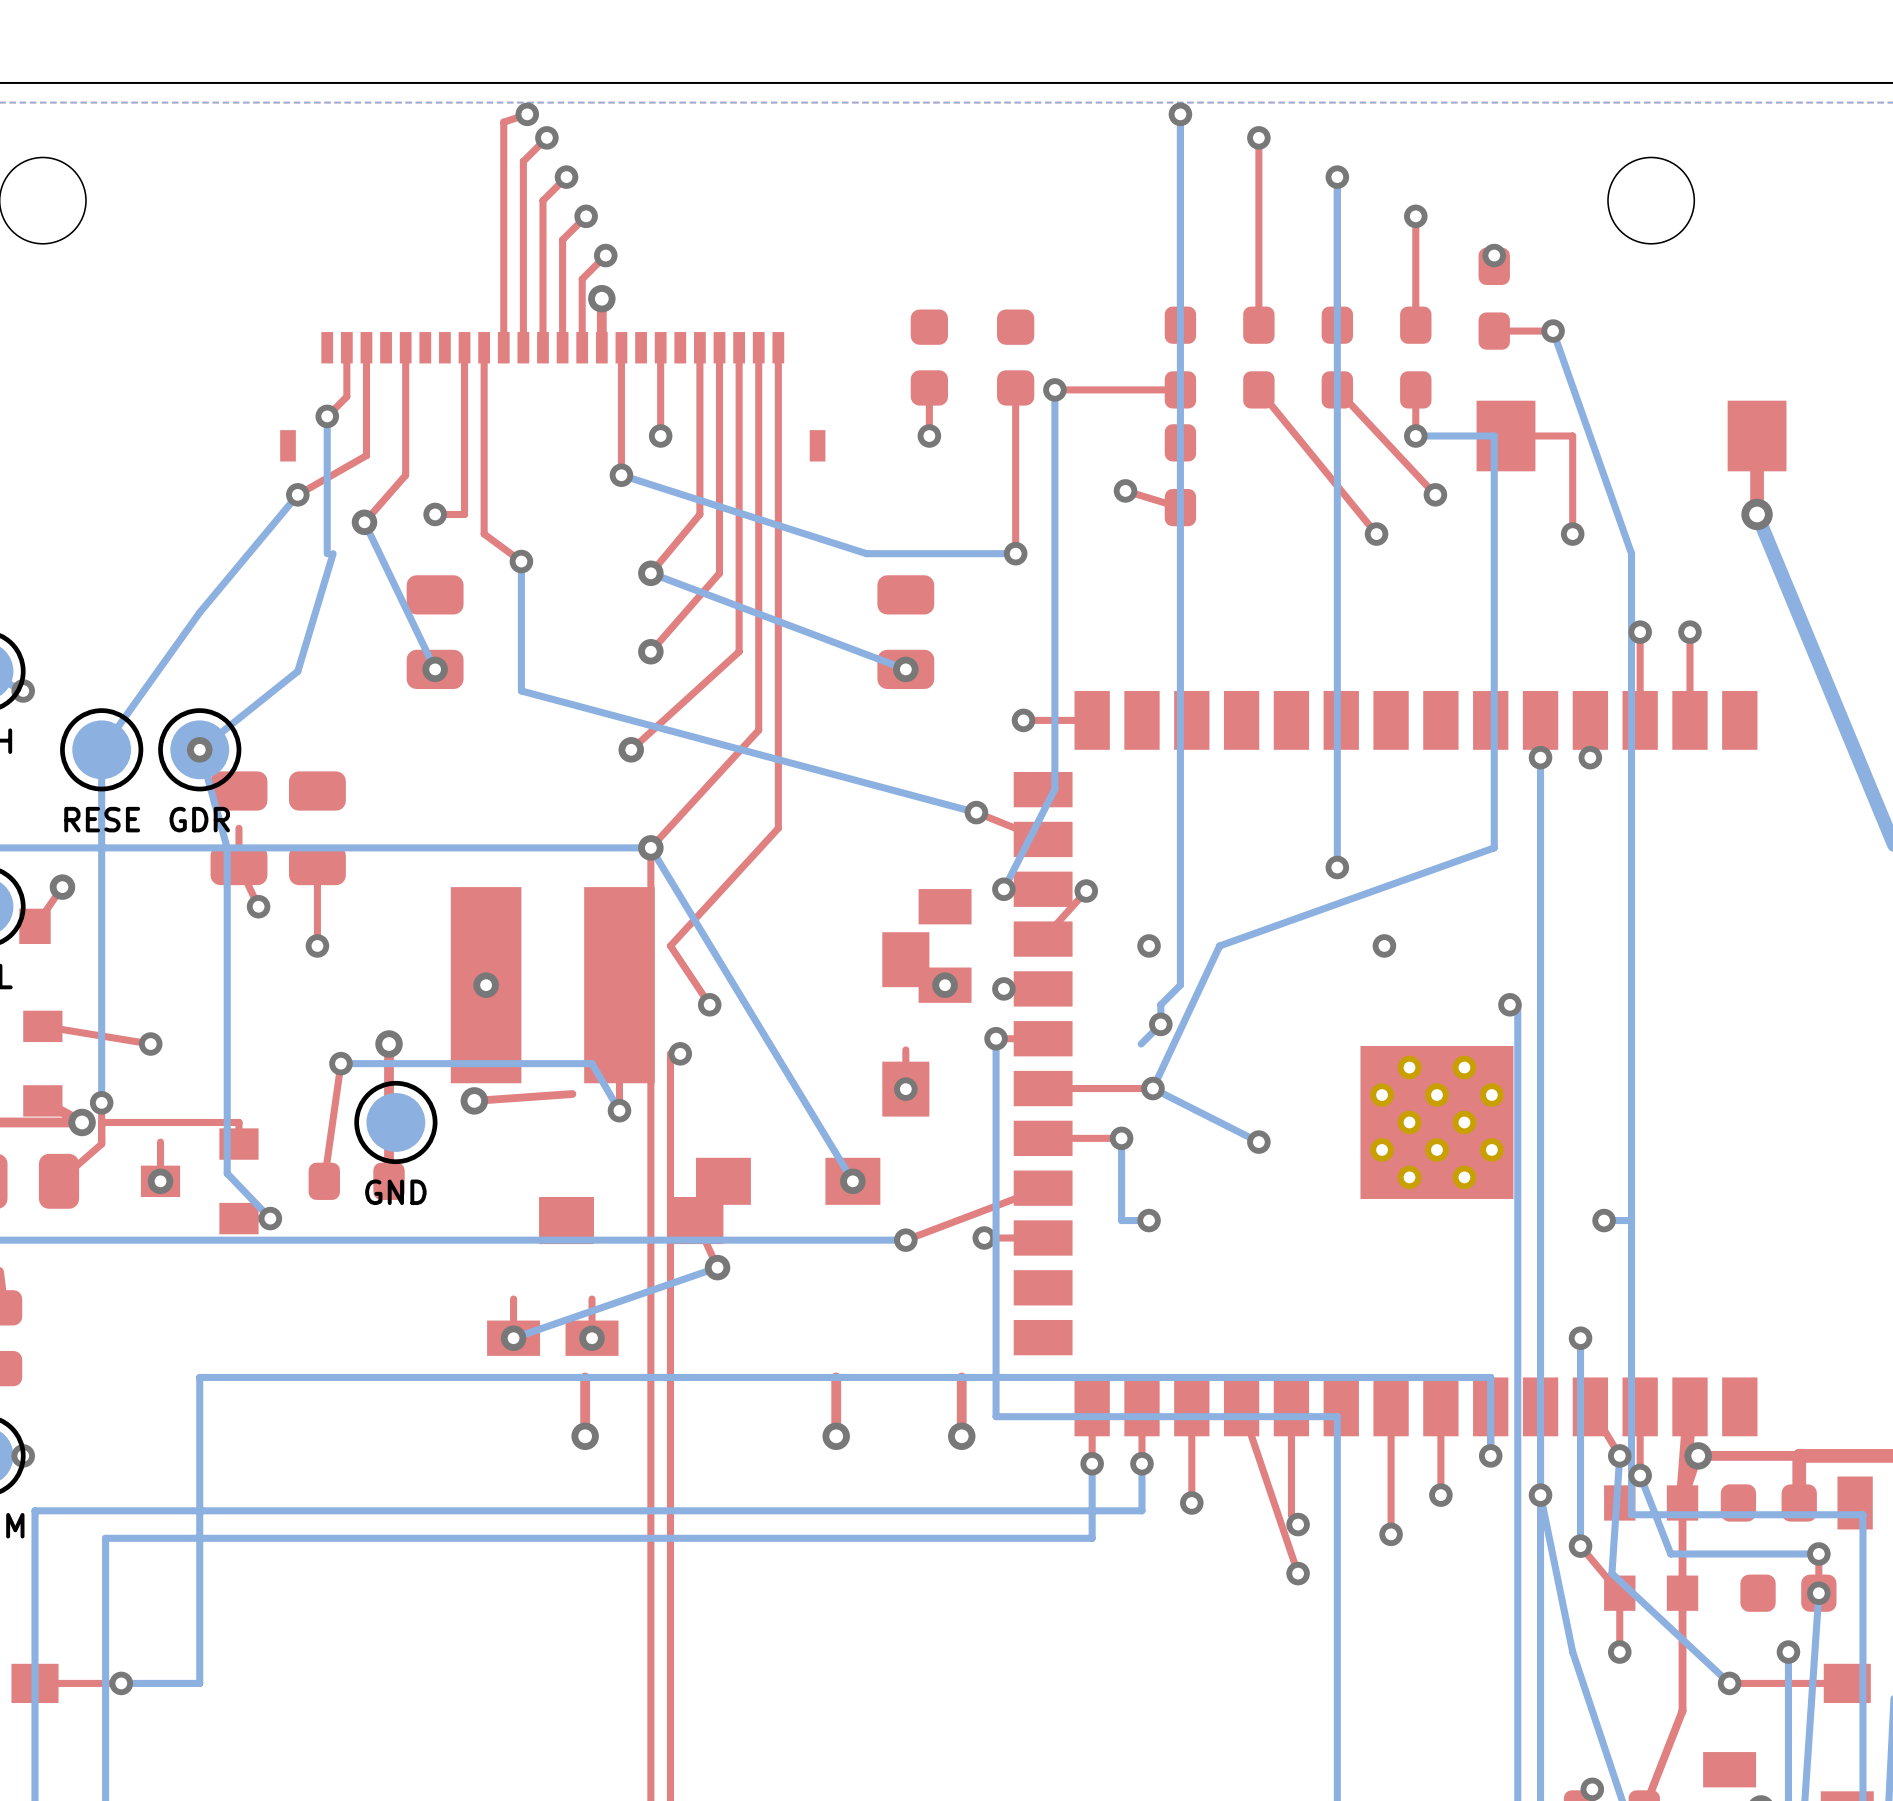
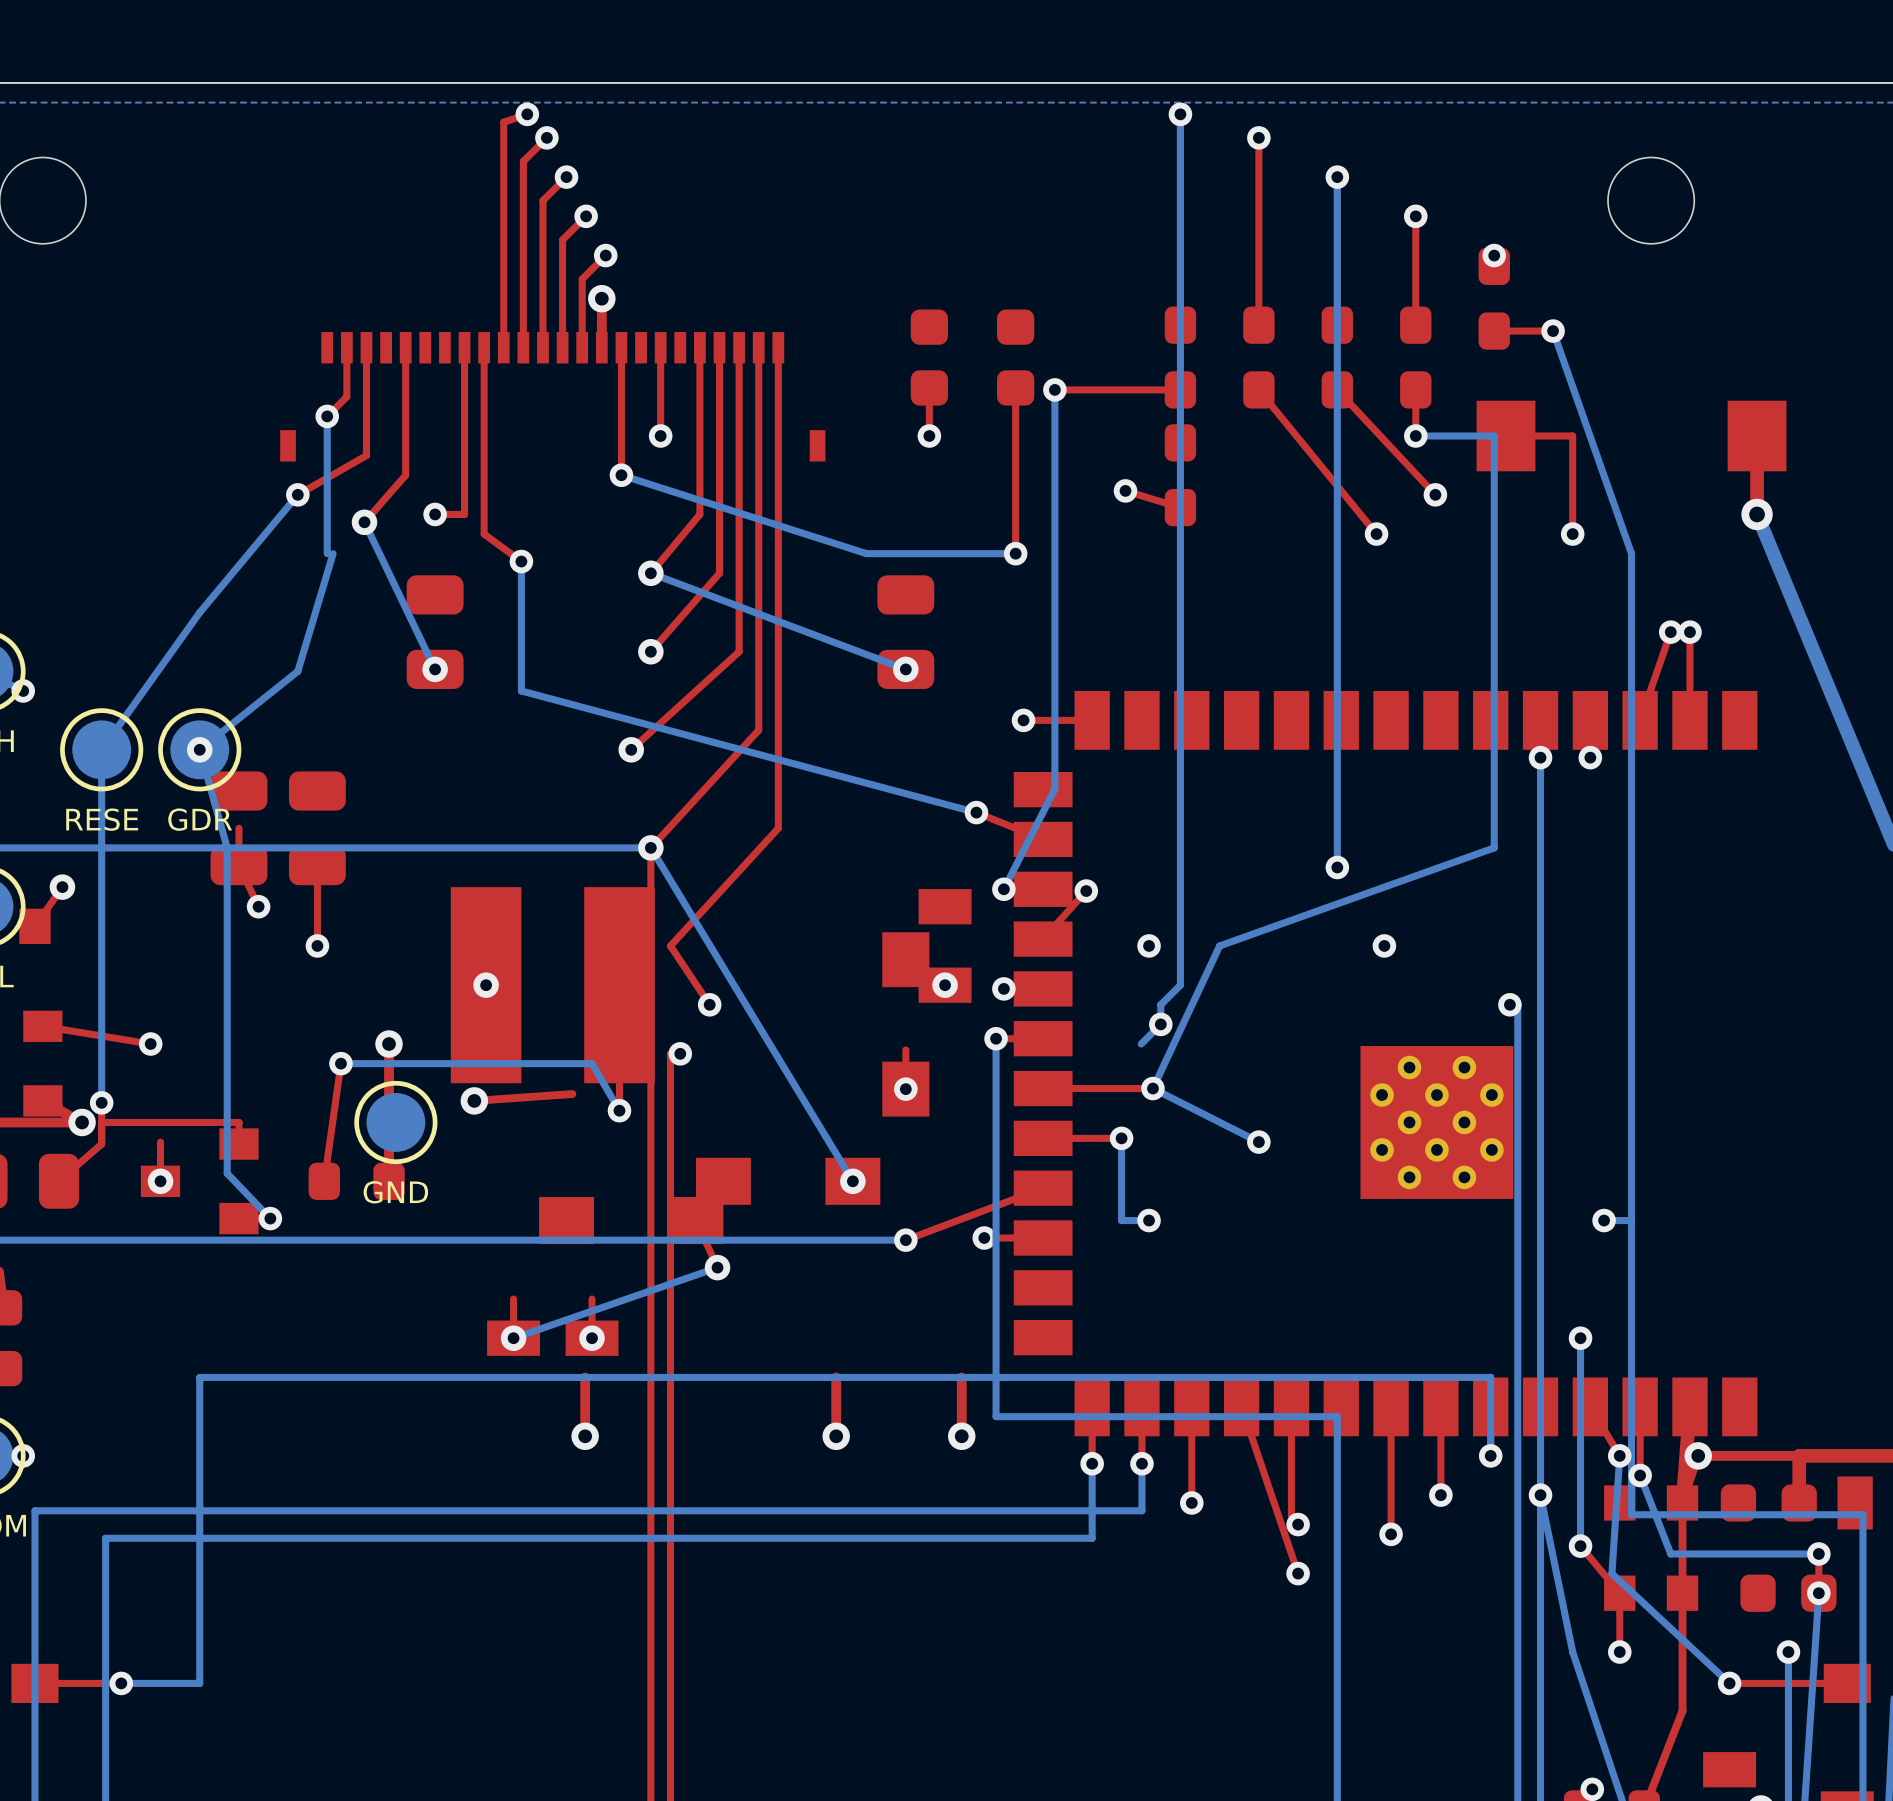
top track: (1640, 632) (1640, 720) -> (1670, 632) (1640, 720)
via position: (1640, 632) -> (1670, 632)

